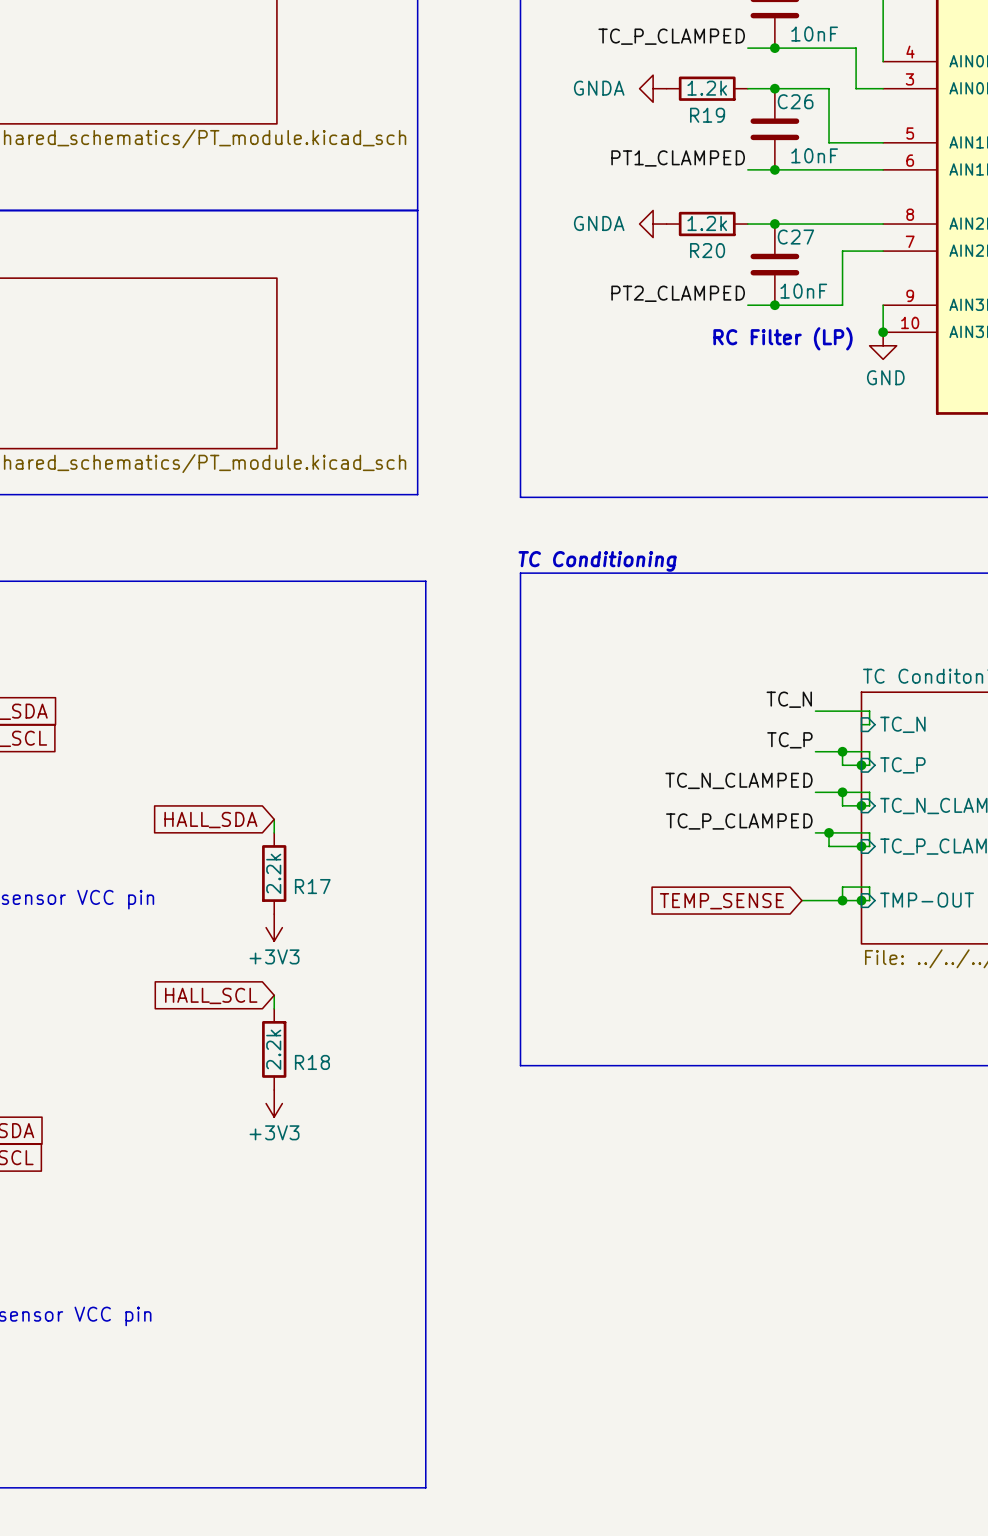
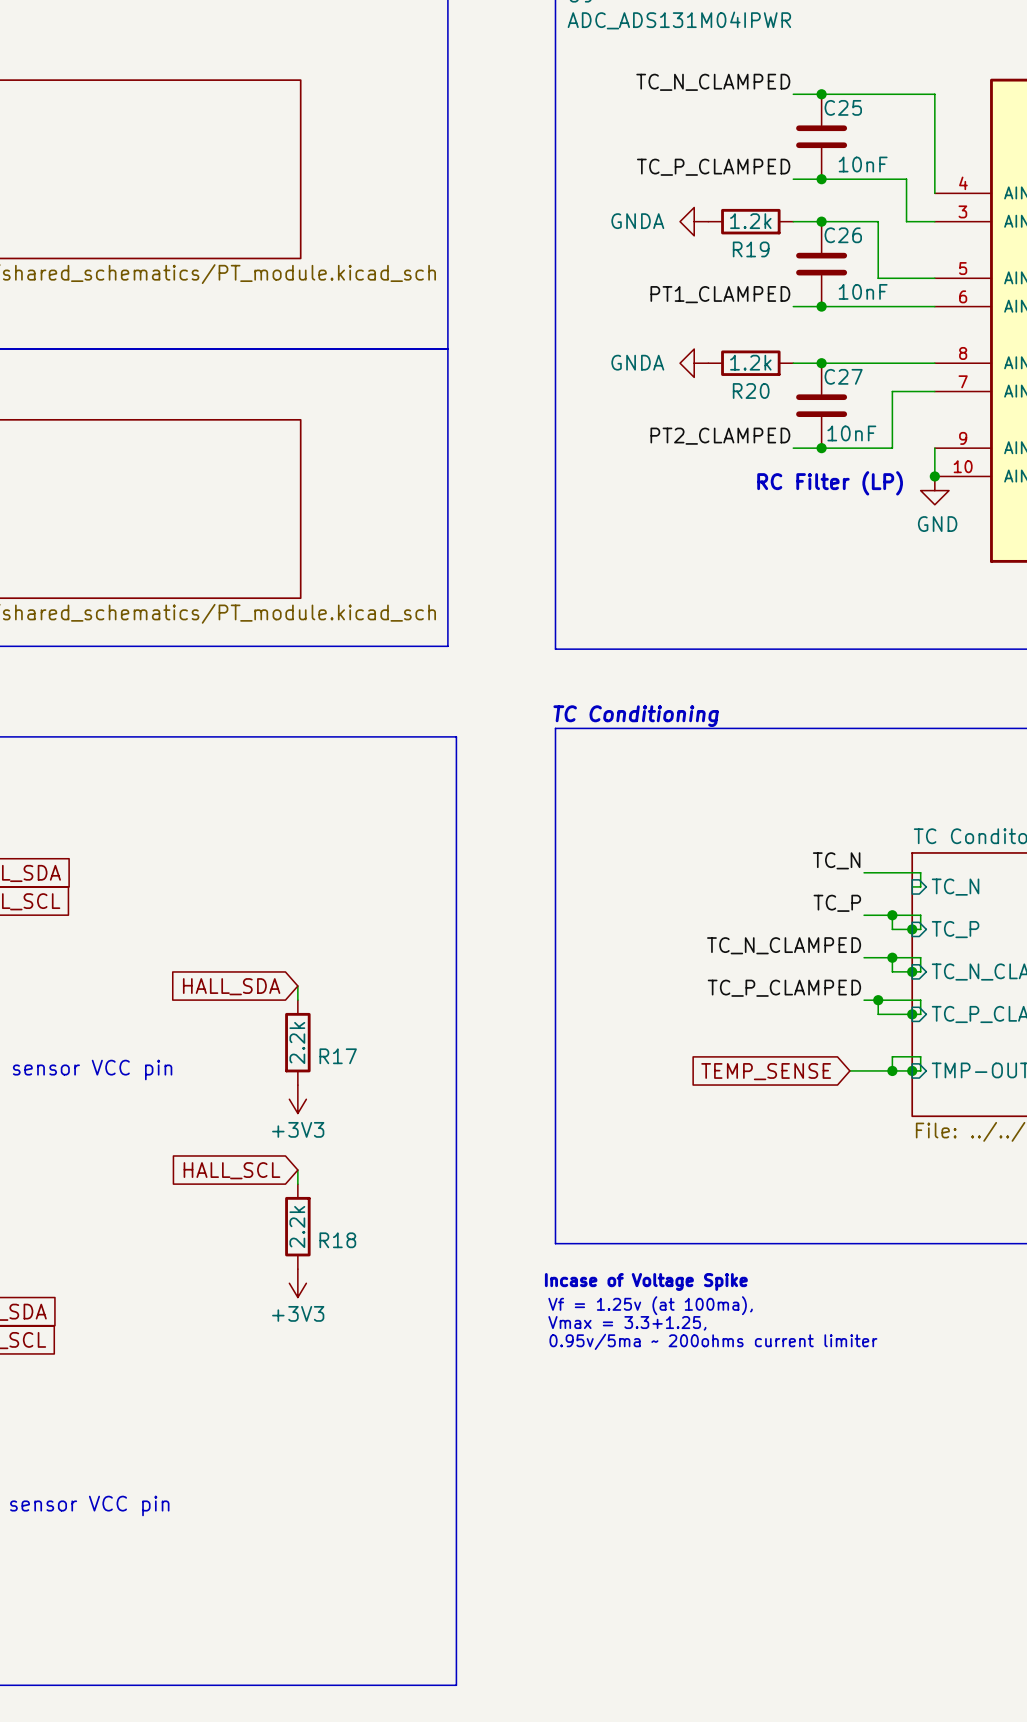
text: none -> Incase of Voltage Spike (646, 1281)
text: none -> Vf = 1.25v (at 100ma), (650, 1305)
text: none -> Vmax = 3.3+1.25, (627, 1323)
text: none -> 0.95v/5ma ~ 200ohms current limiter (713, 1341)

